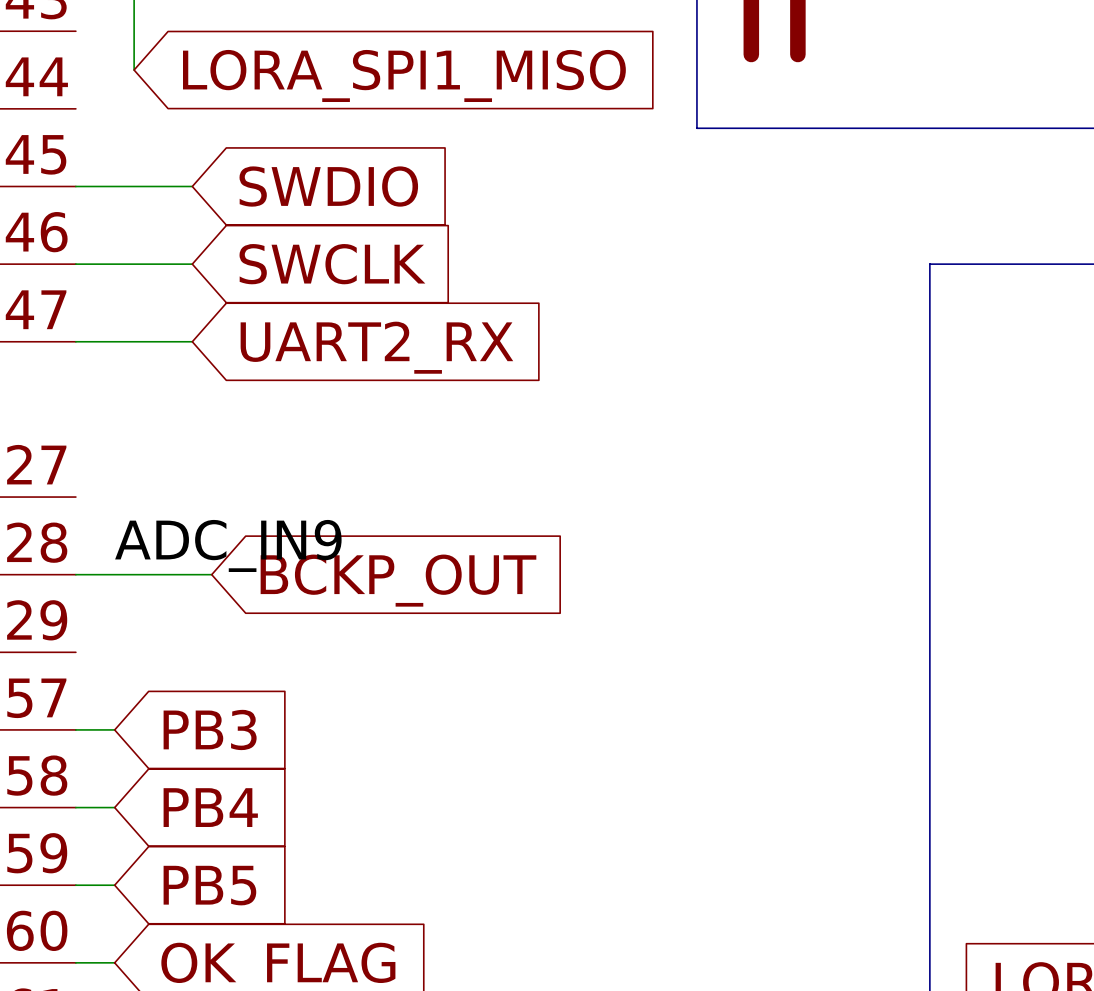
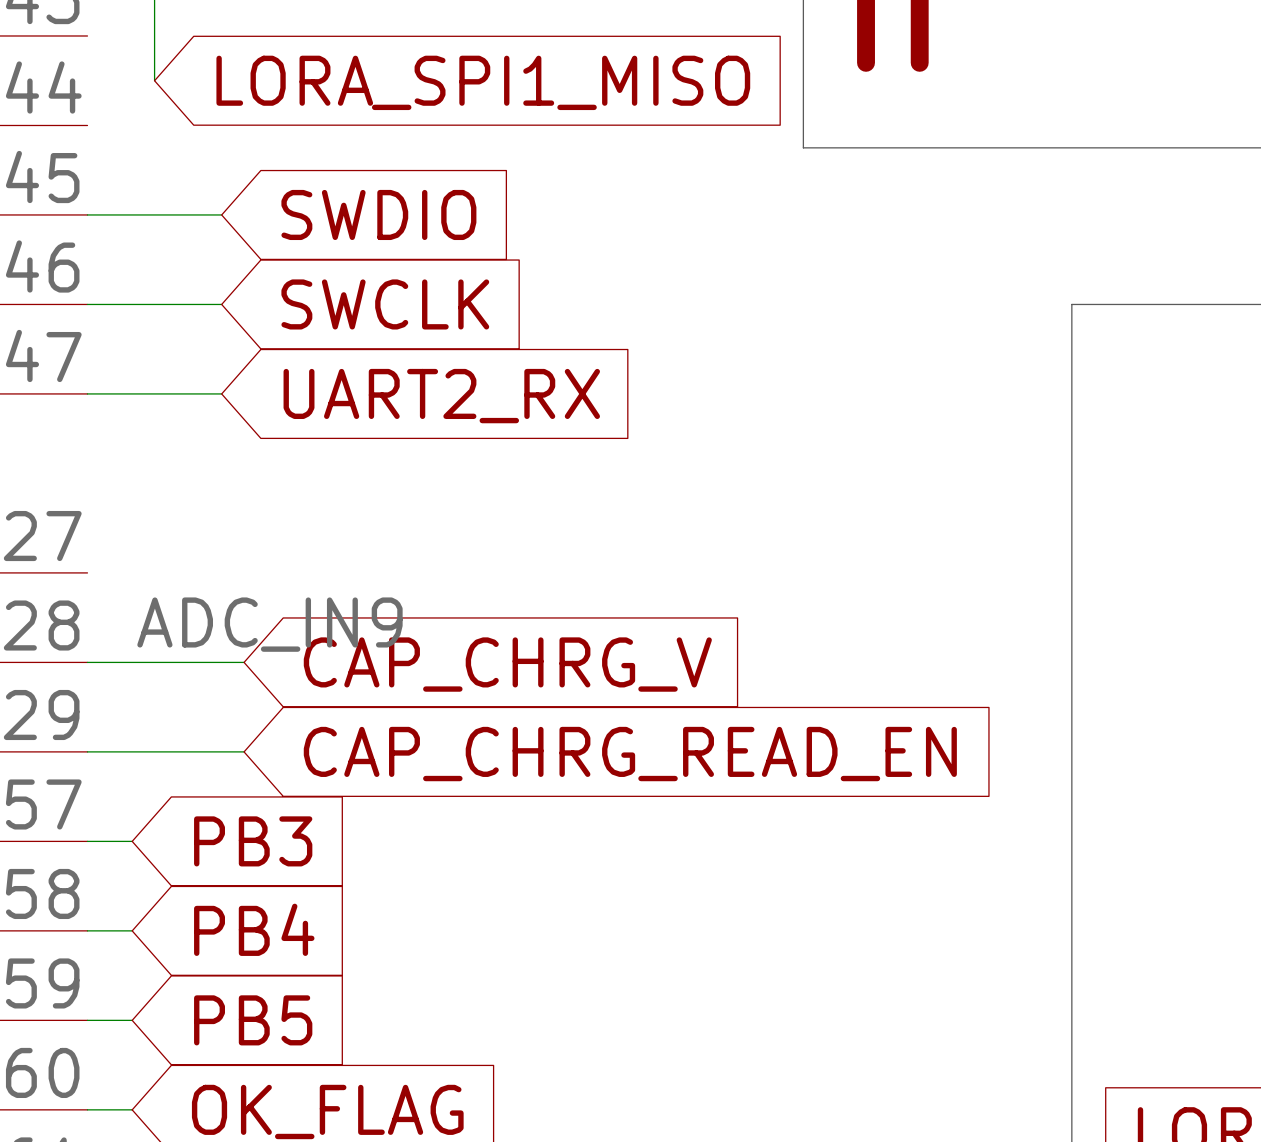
global label: BCKP_OUT (398, 580) -> CAP_CHRG_V (507, 664)
wire: none -> (87, 751) (244, 751)
global label: none -> CAP_CHRG_READ_EN (630, 754)

